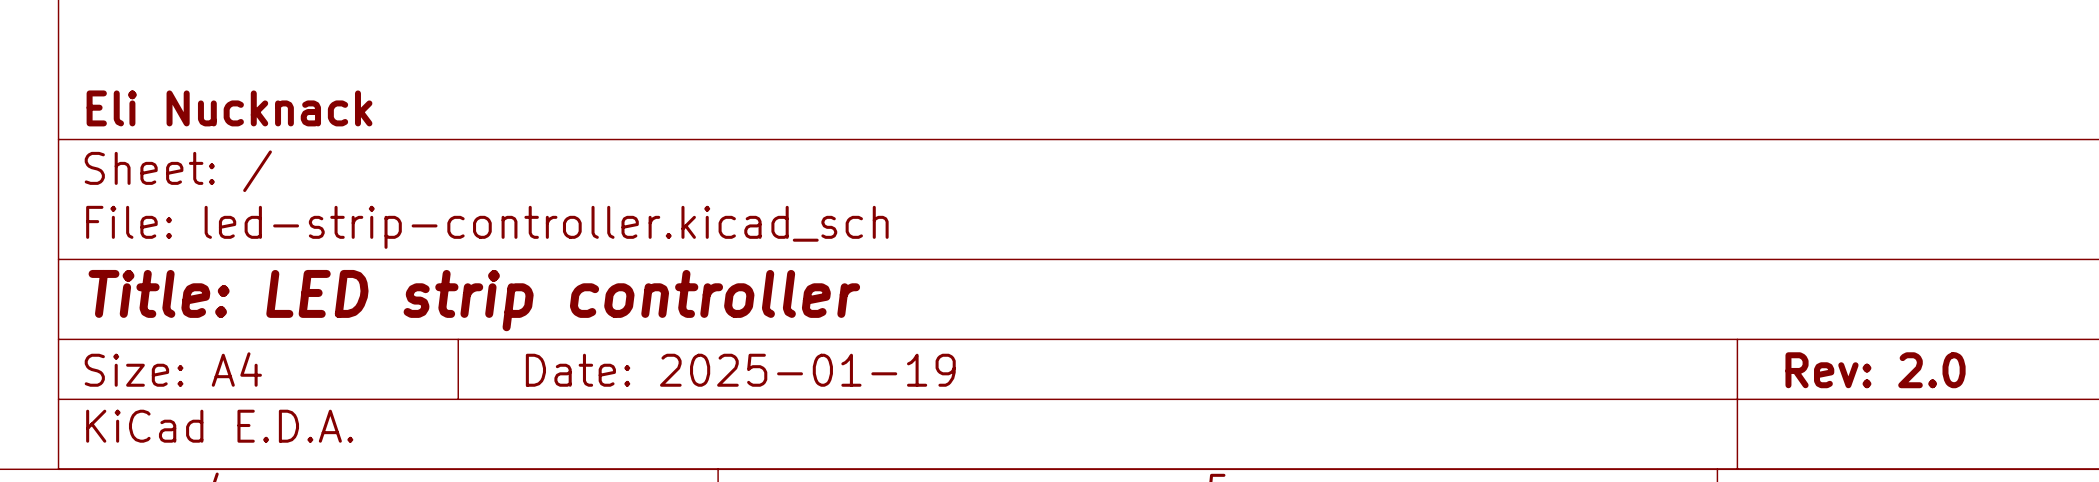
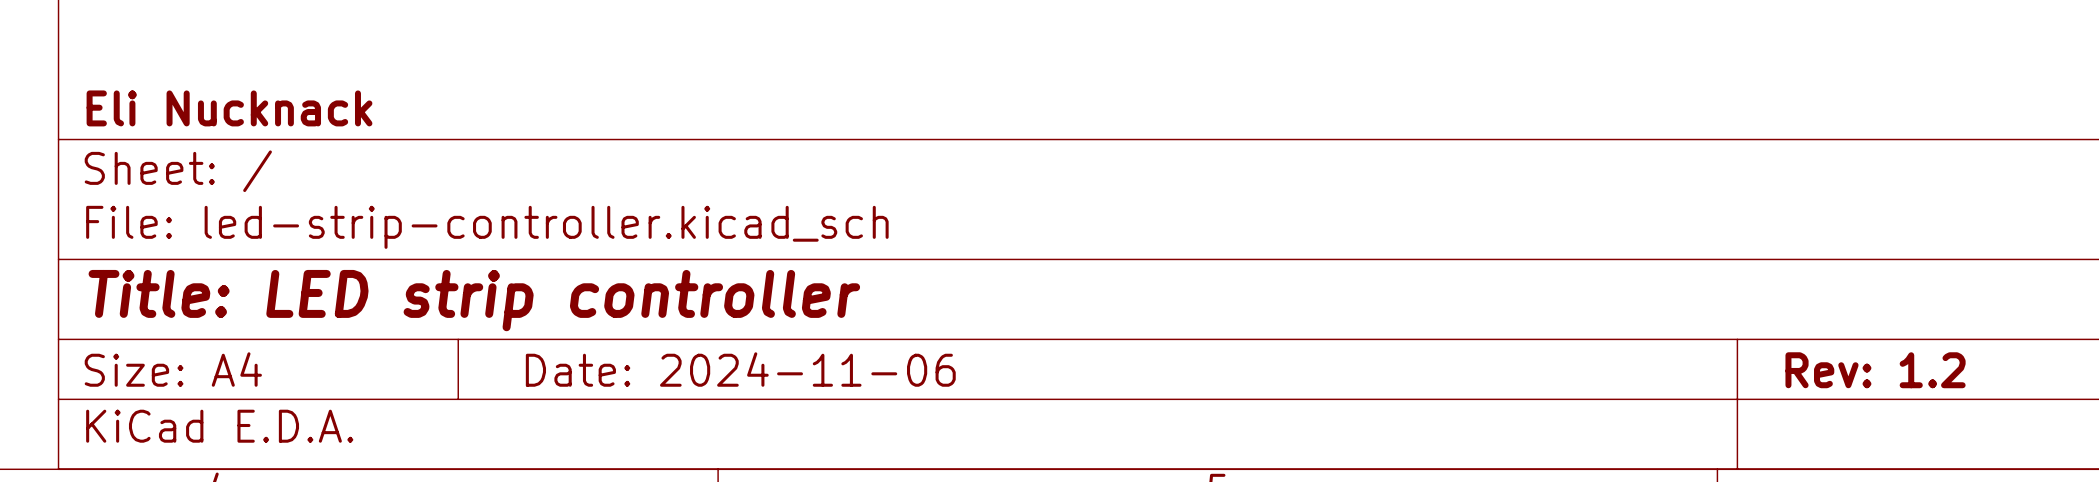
title block: Date: 2025-01-19 (740, 370) -> Date: 2024-11-06 (740, 369)
title block: Rev: 2.0 (1875, 370) -> Rev: 1.2 (1875, 370)

